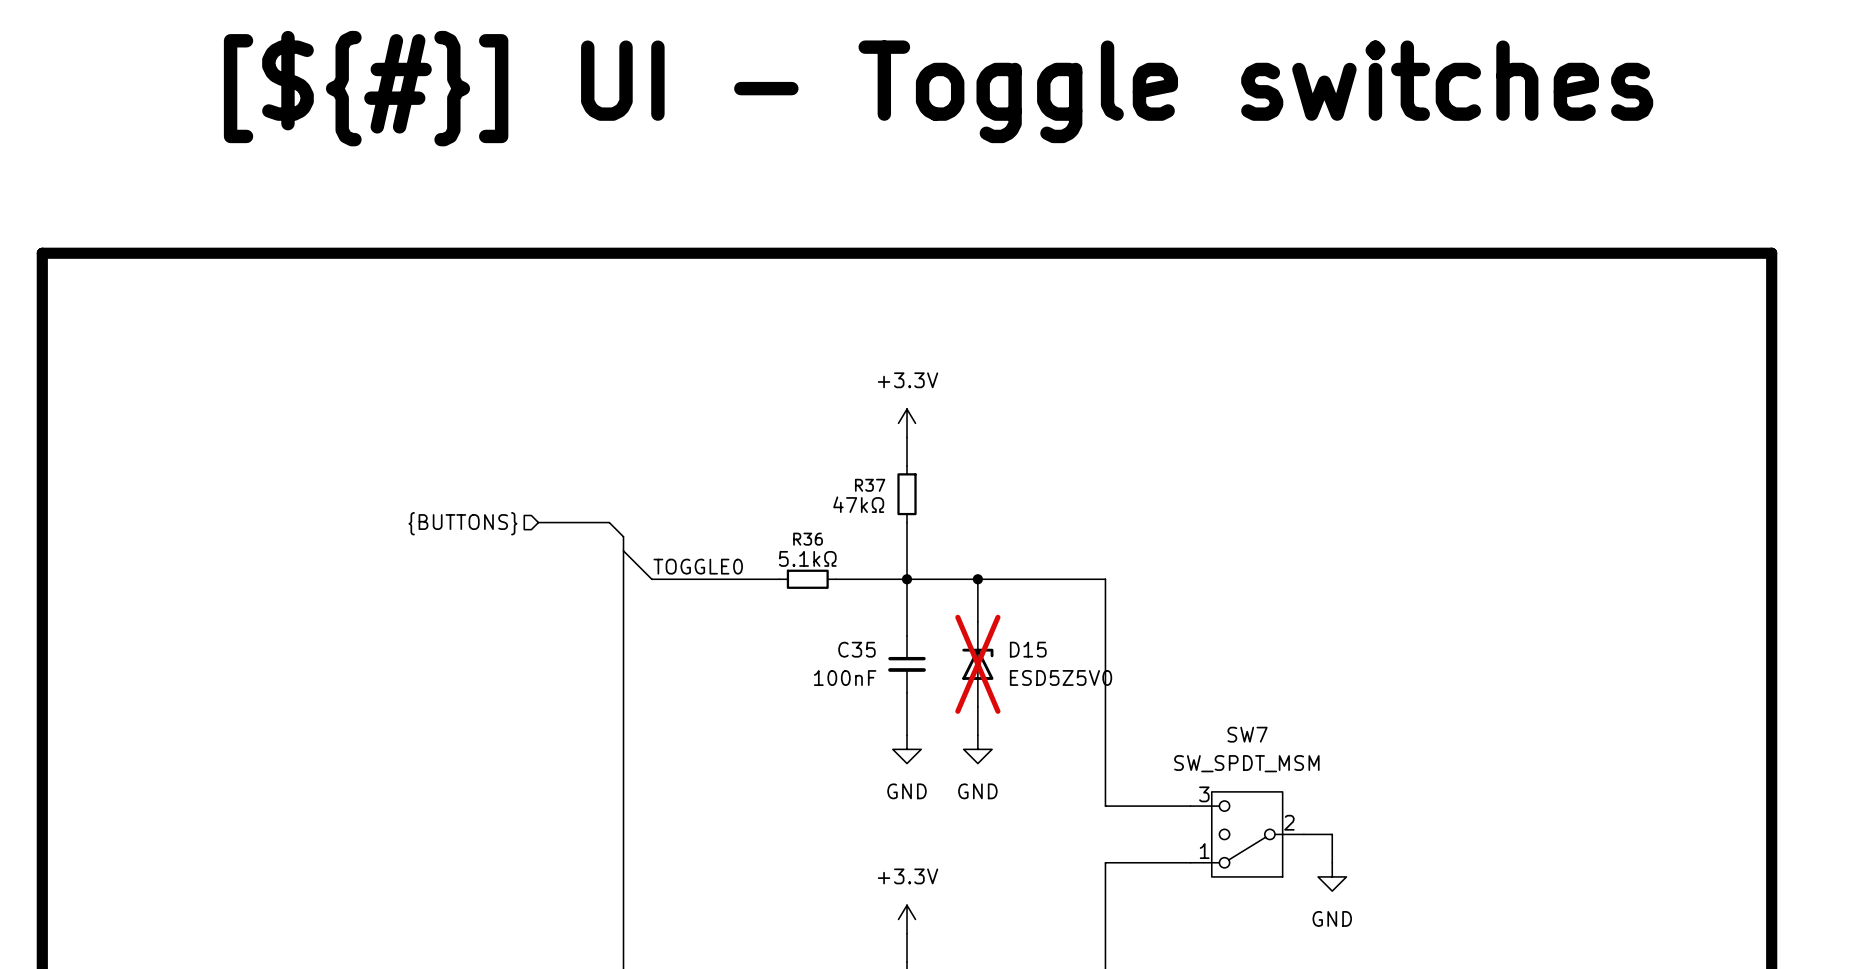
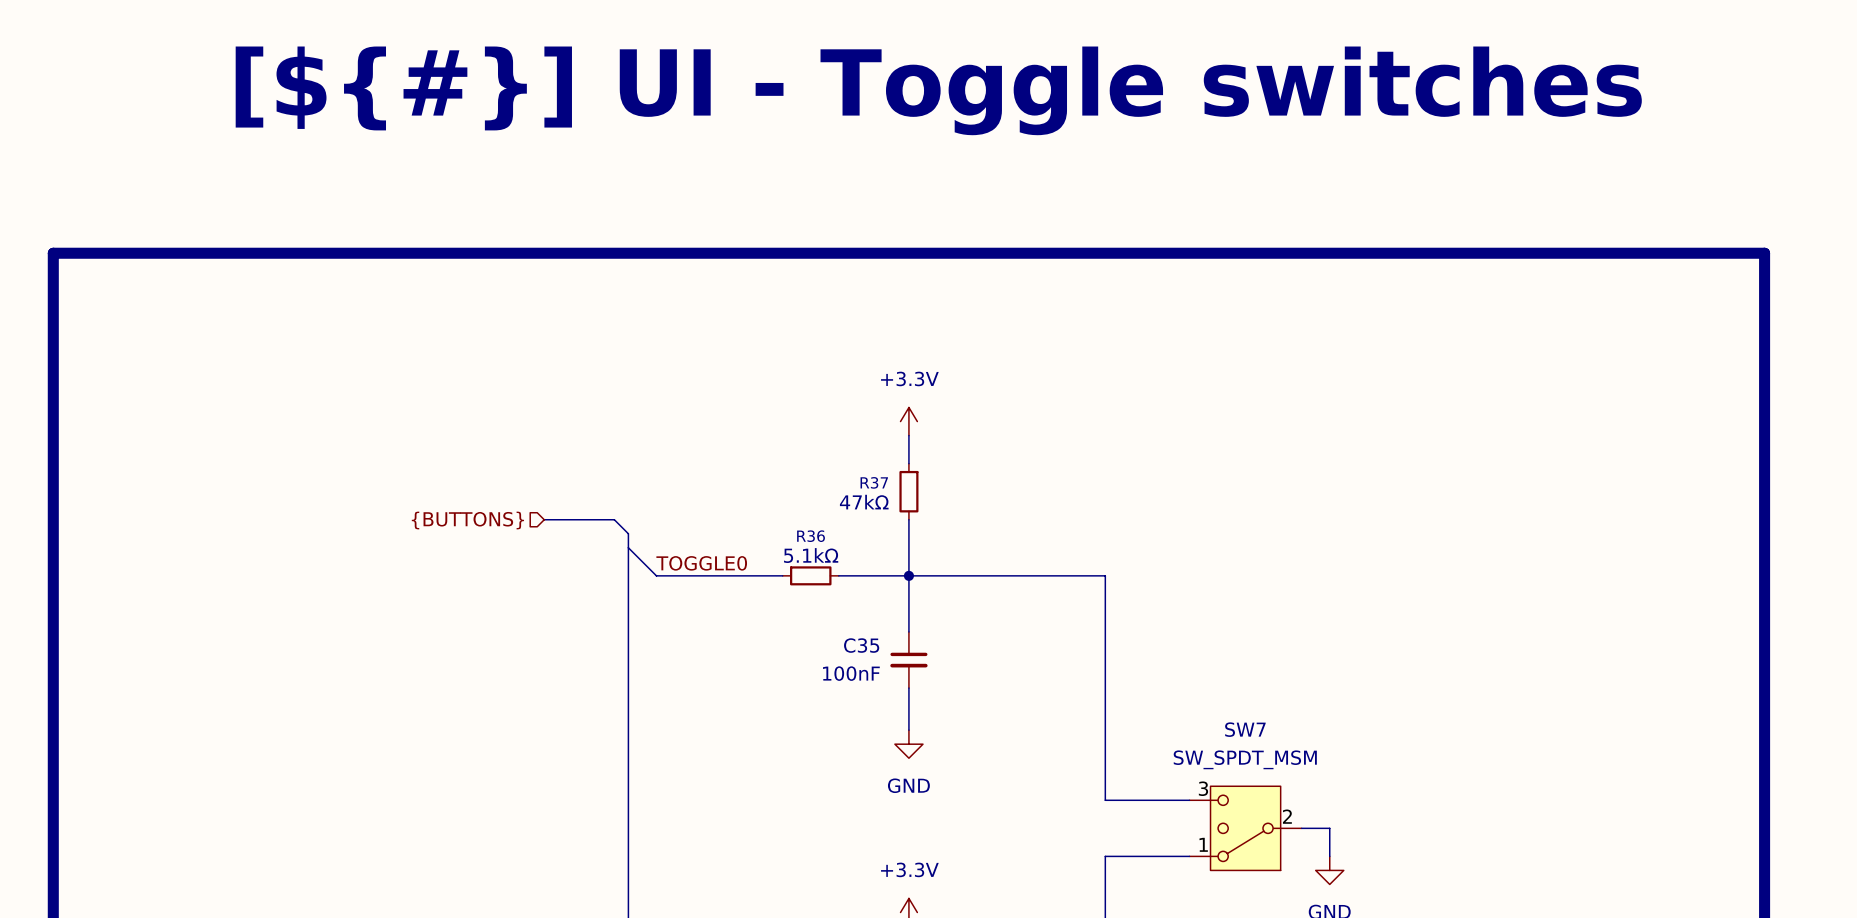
wire: (977, 579) (977, 621) -> none
junction: (977, 579) -> none
D15: ESD5Z5V0 (977, 664) -> none
wire: (977, 706) (977, 735) -> none
power symbol: GND (977, 749) -> none

